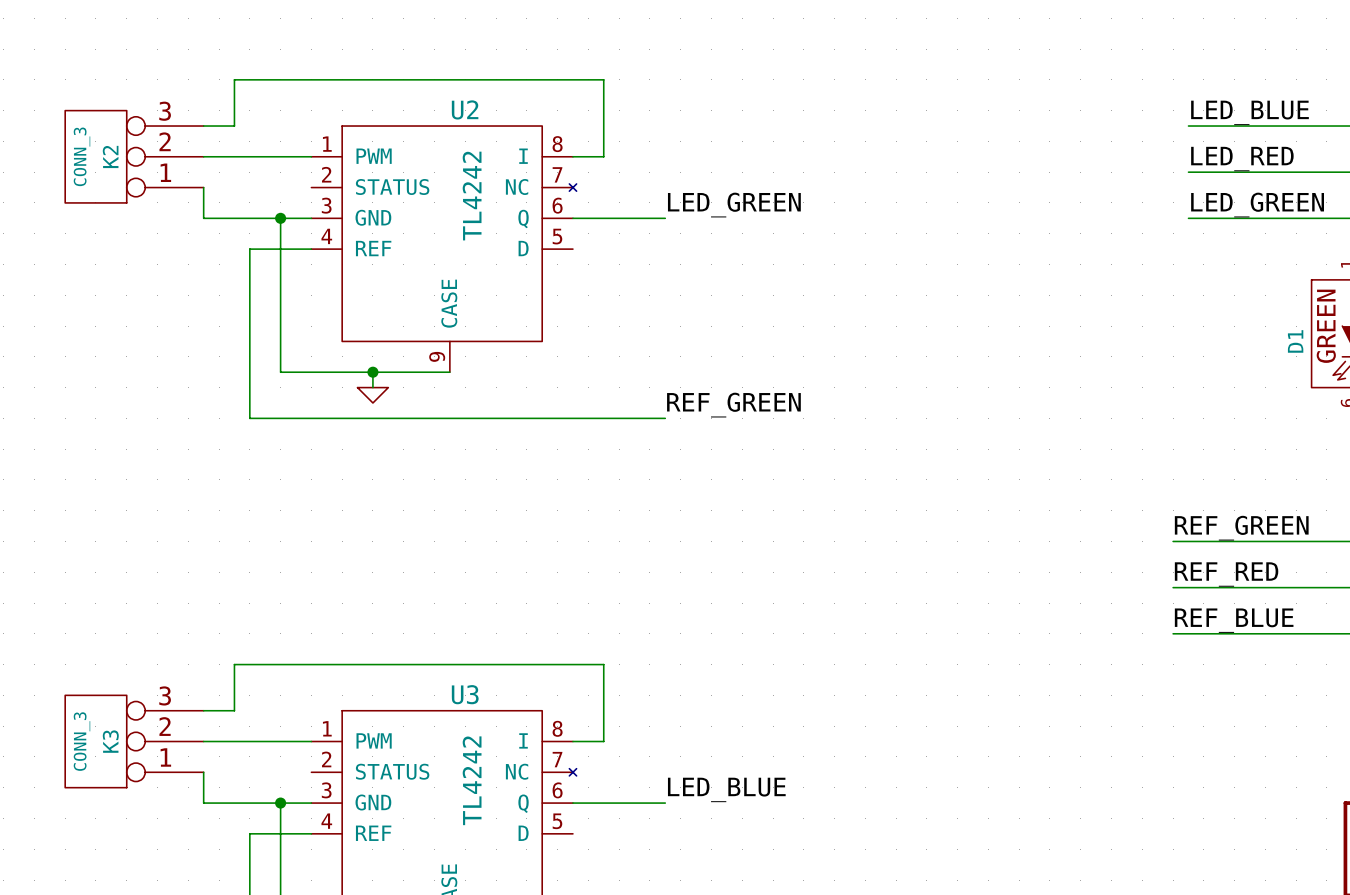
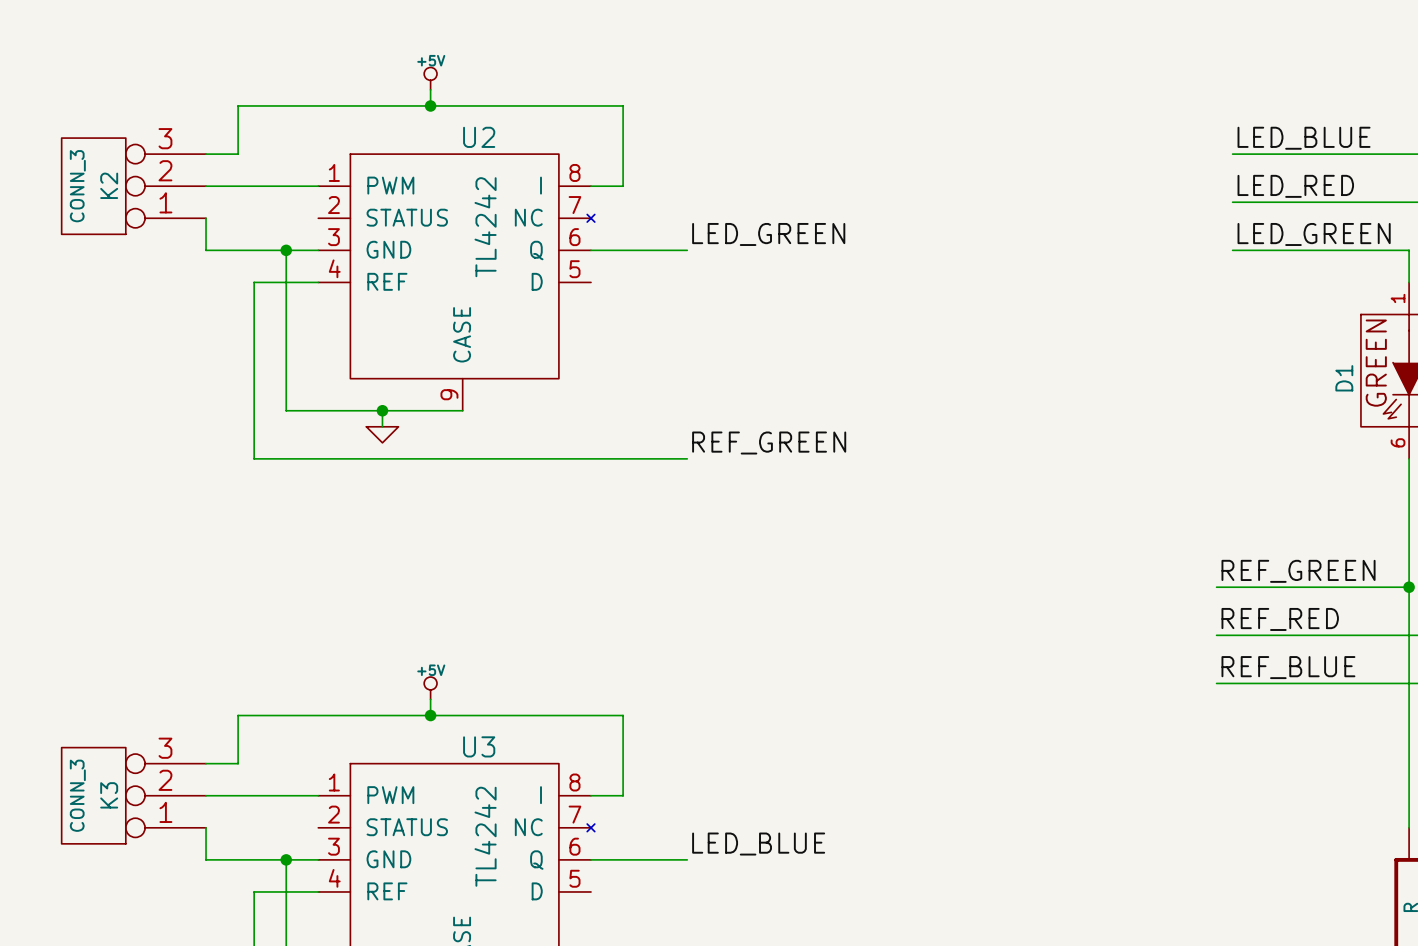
power symbol: none -> +5V (430, 78)
wire: none -> (430, 89) (430, 105)
junction: none -> (430, 105)
power symbol: none -> +5V (430, 688)
wire: none -> (430, 699) (430, 715)
junction: none -> (430, 715)

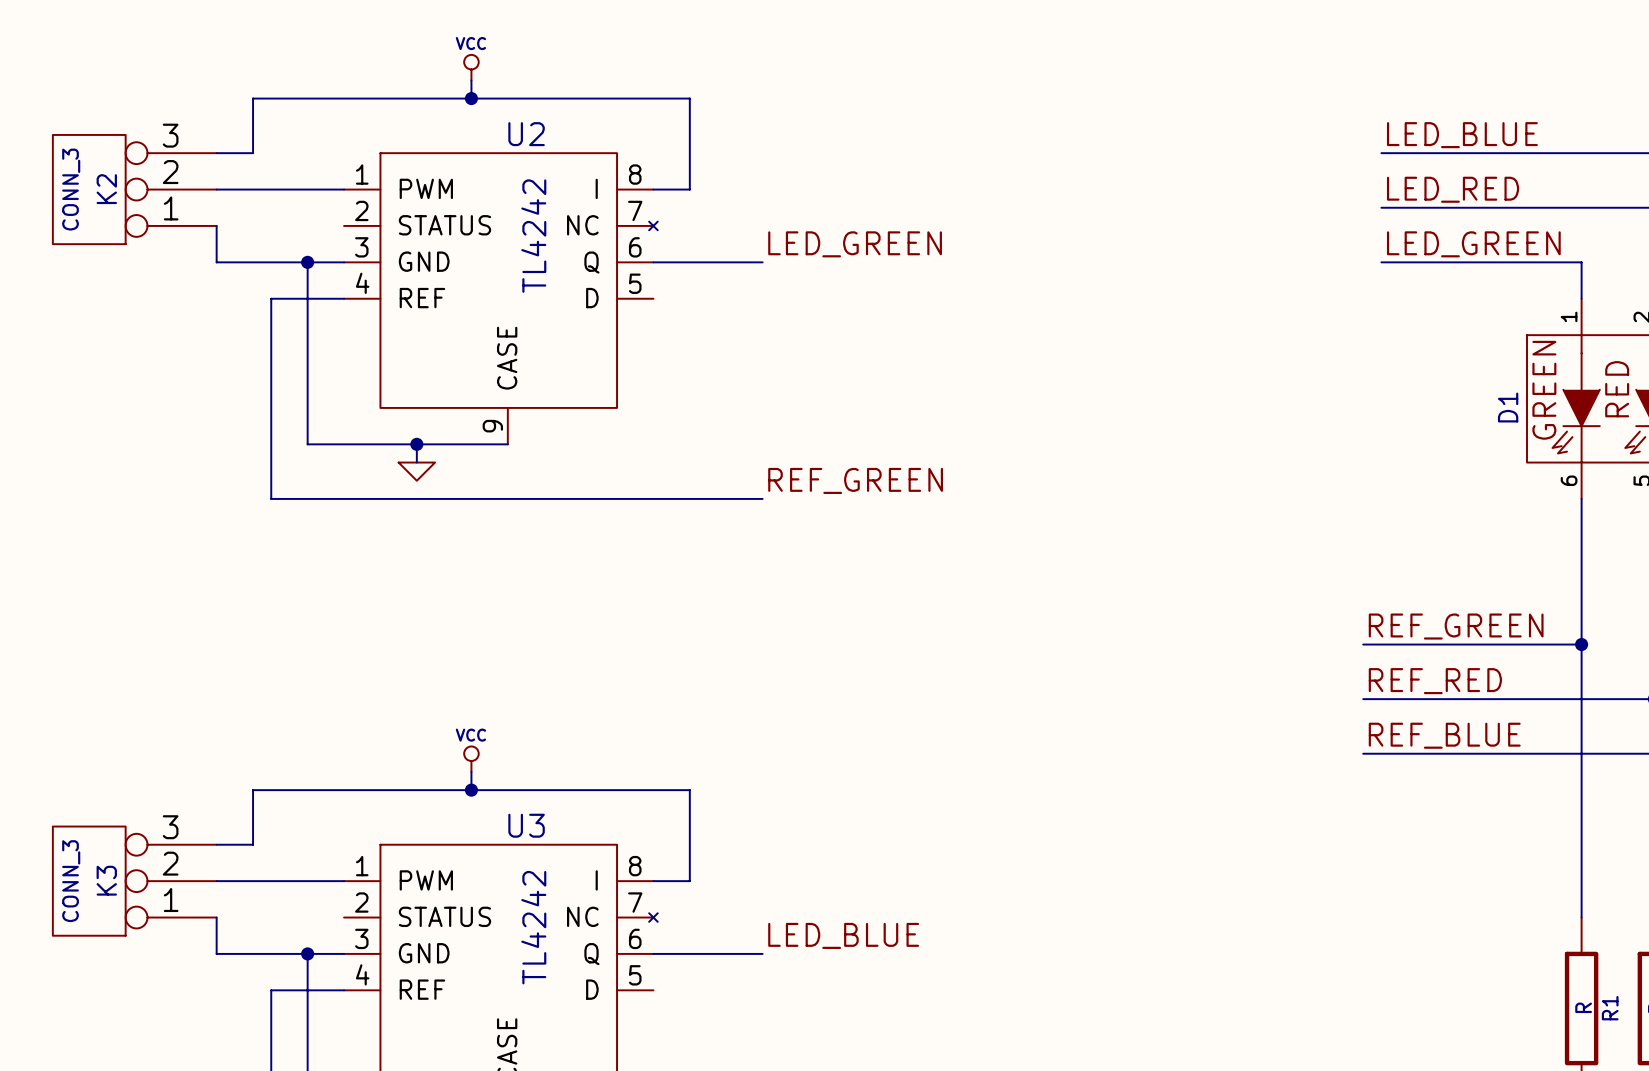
power symbol: +5V (430, 78) -> VCC (471, 67)
power symbol: +5V (430, 688) -> VCC (471, 759)

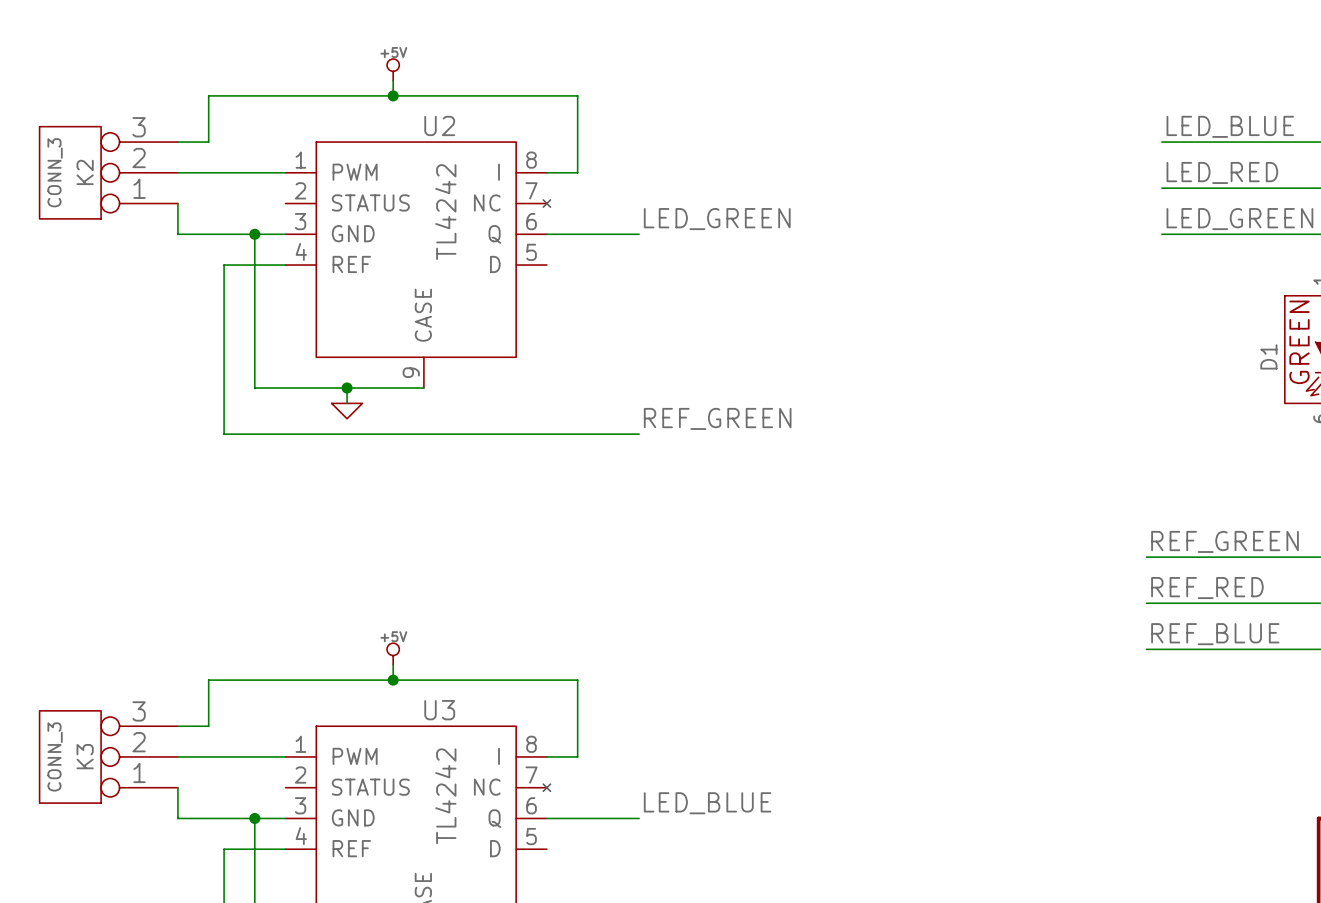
power symbol: VCC (471, 67) -> +5V (393, 69)
power symbol: VCC (471, 759) -> +5V (393, 653)

